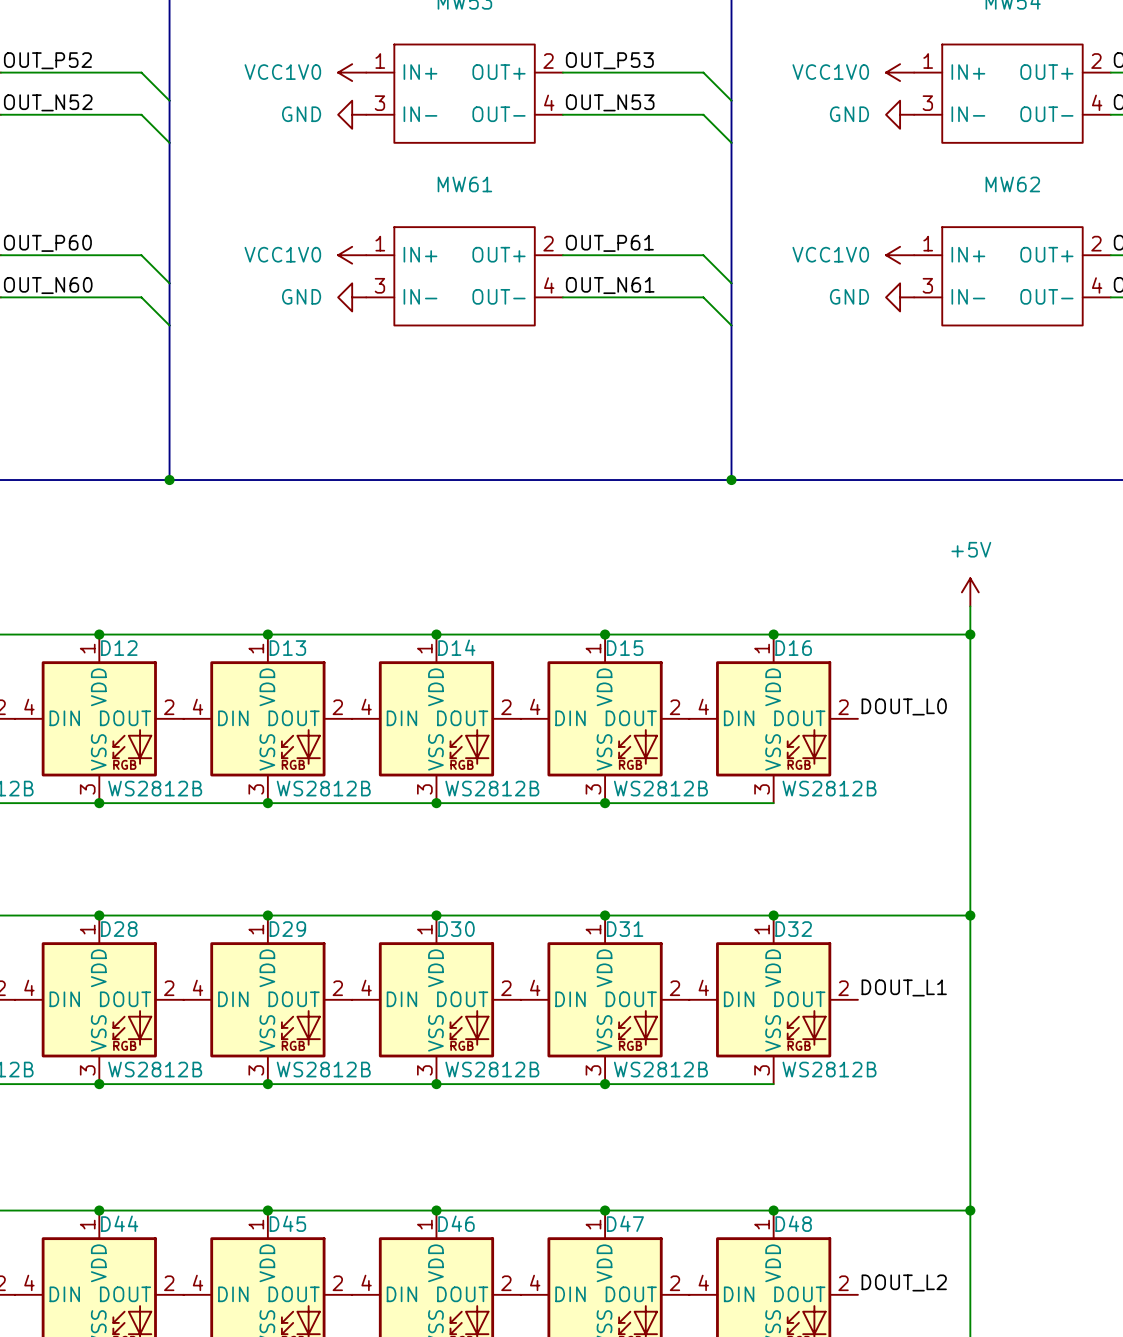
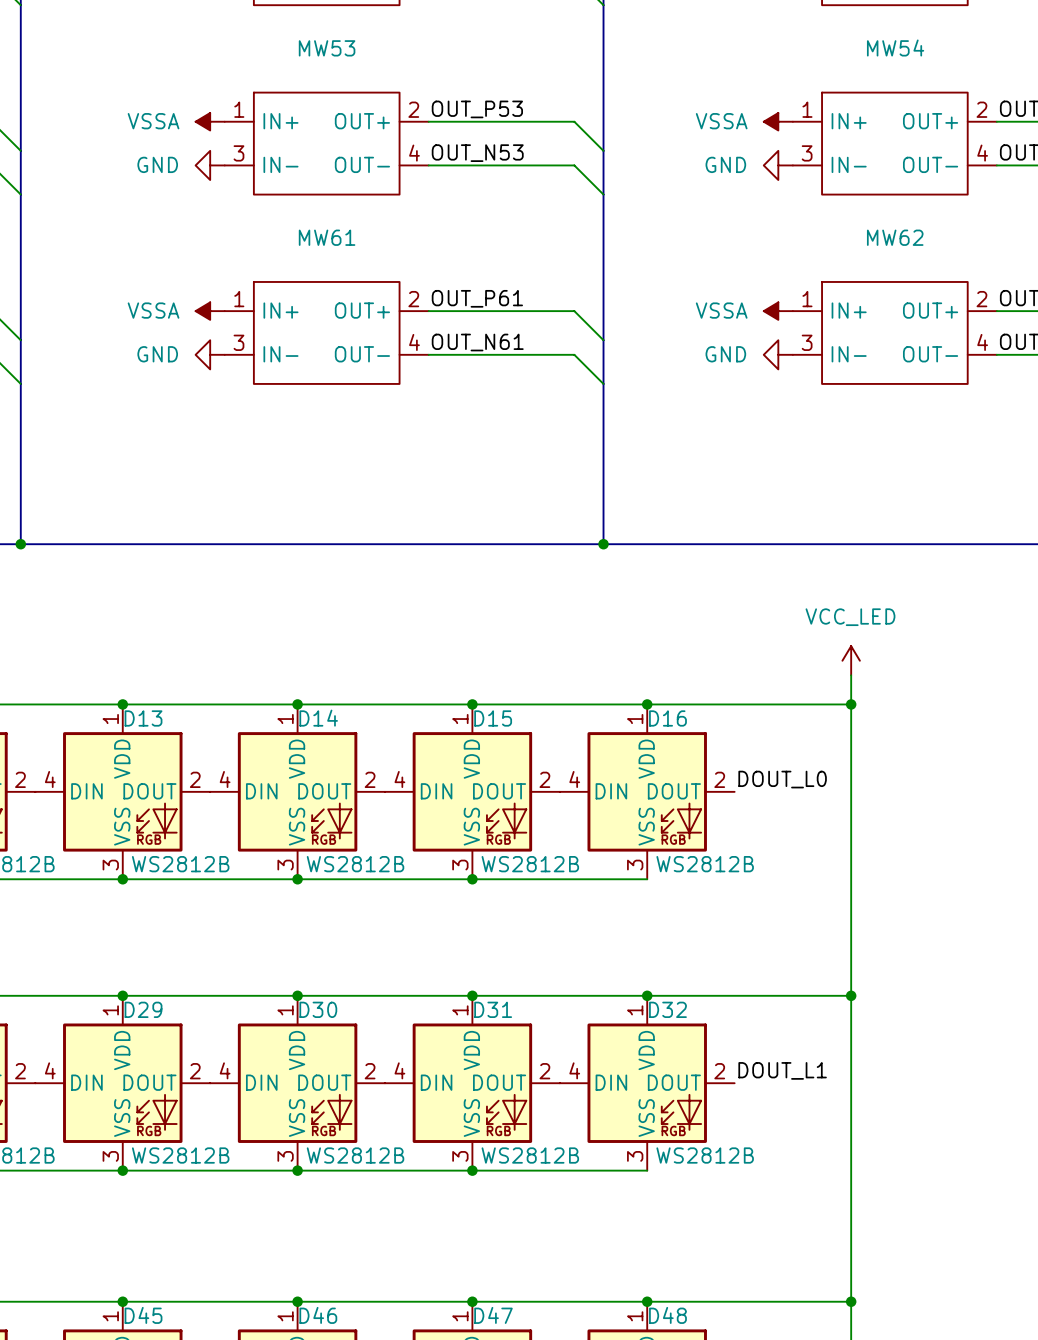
power symbol: VCC1V0 (352, 72) -> VSSA (210, 121)
power symbol: VCC1V0 (900, 72) -> VSSA (778, 121)
power symbol: VCC1V0 (352, 255) -> VSSA (210, 311)
power symbol: VCC1V0 (900, 255) -> VSSA (778, 311)
power symbol: +5V (970, 592) -> VCC_LED (851, 660)

